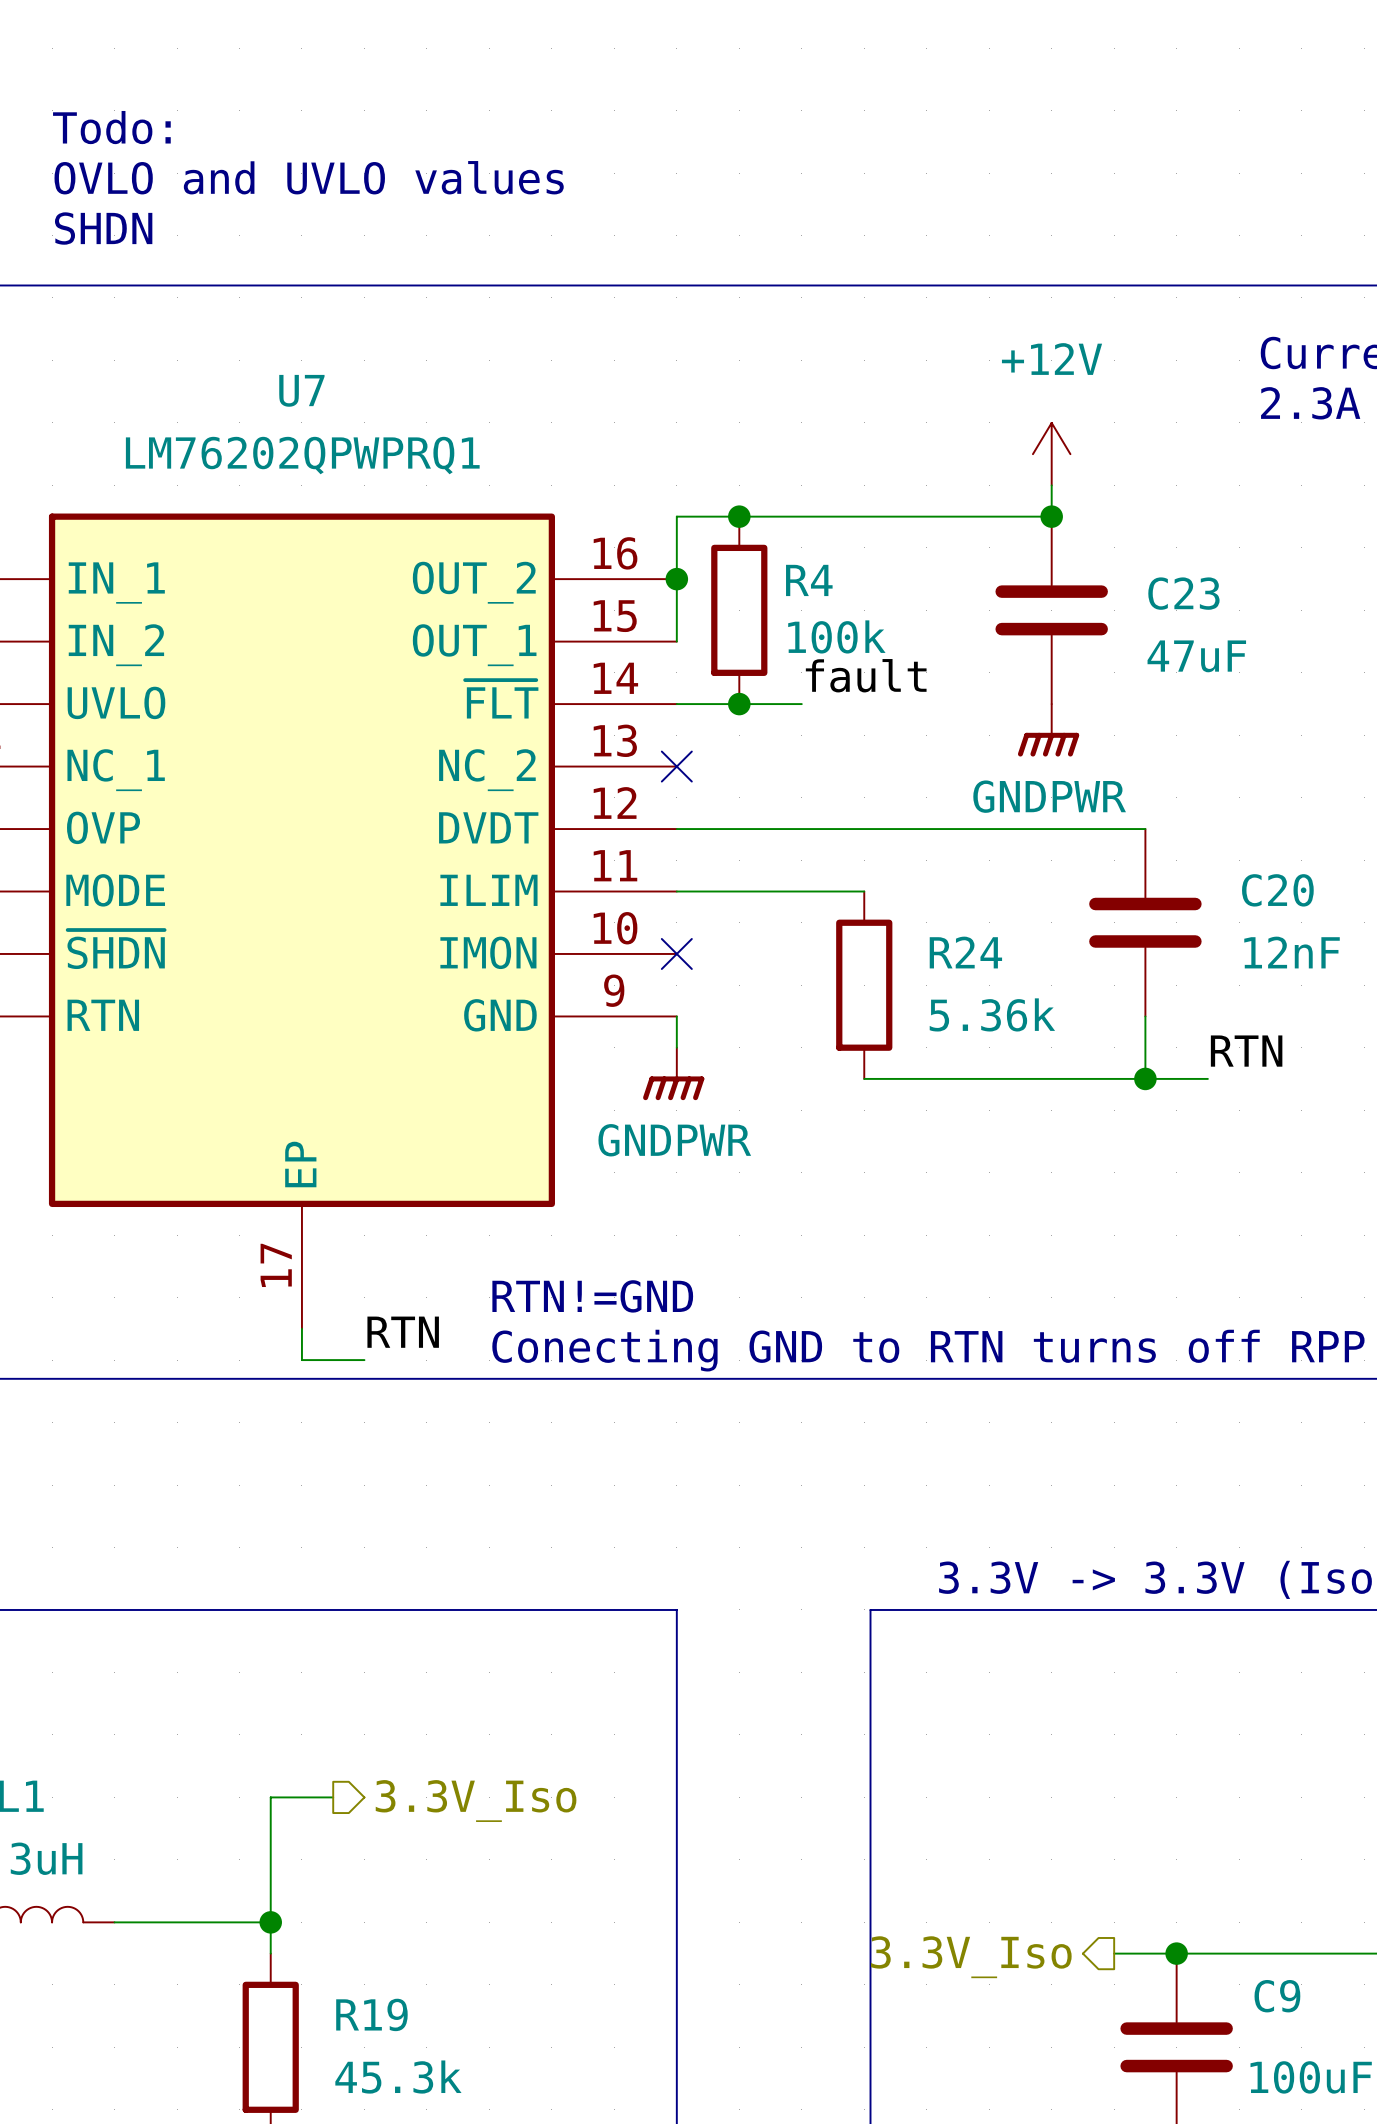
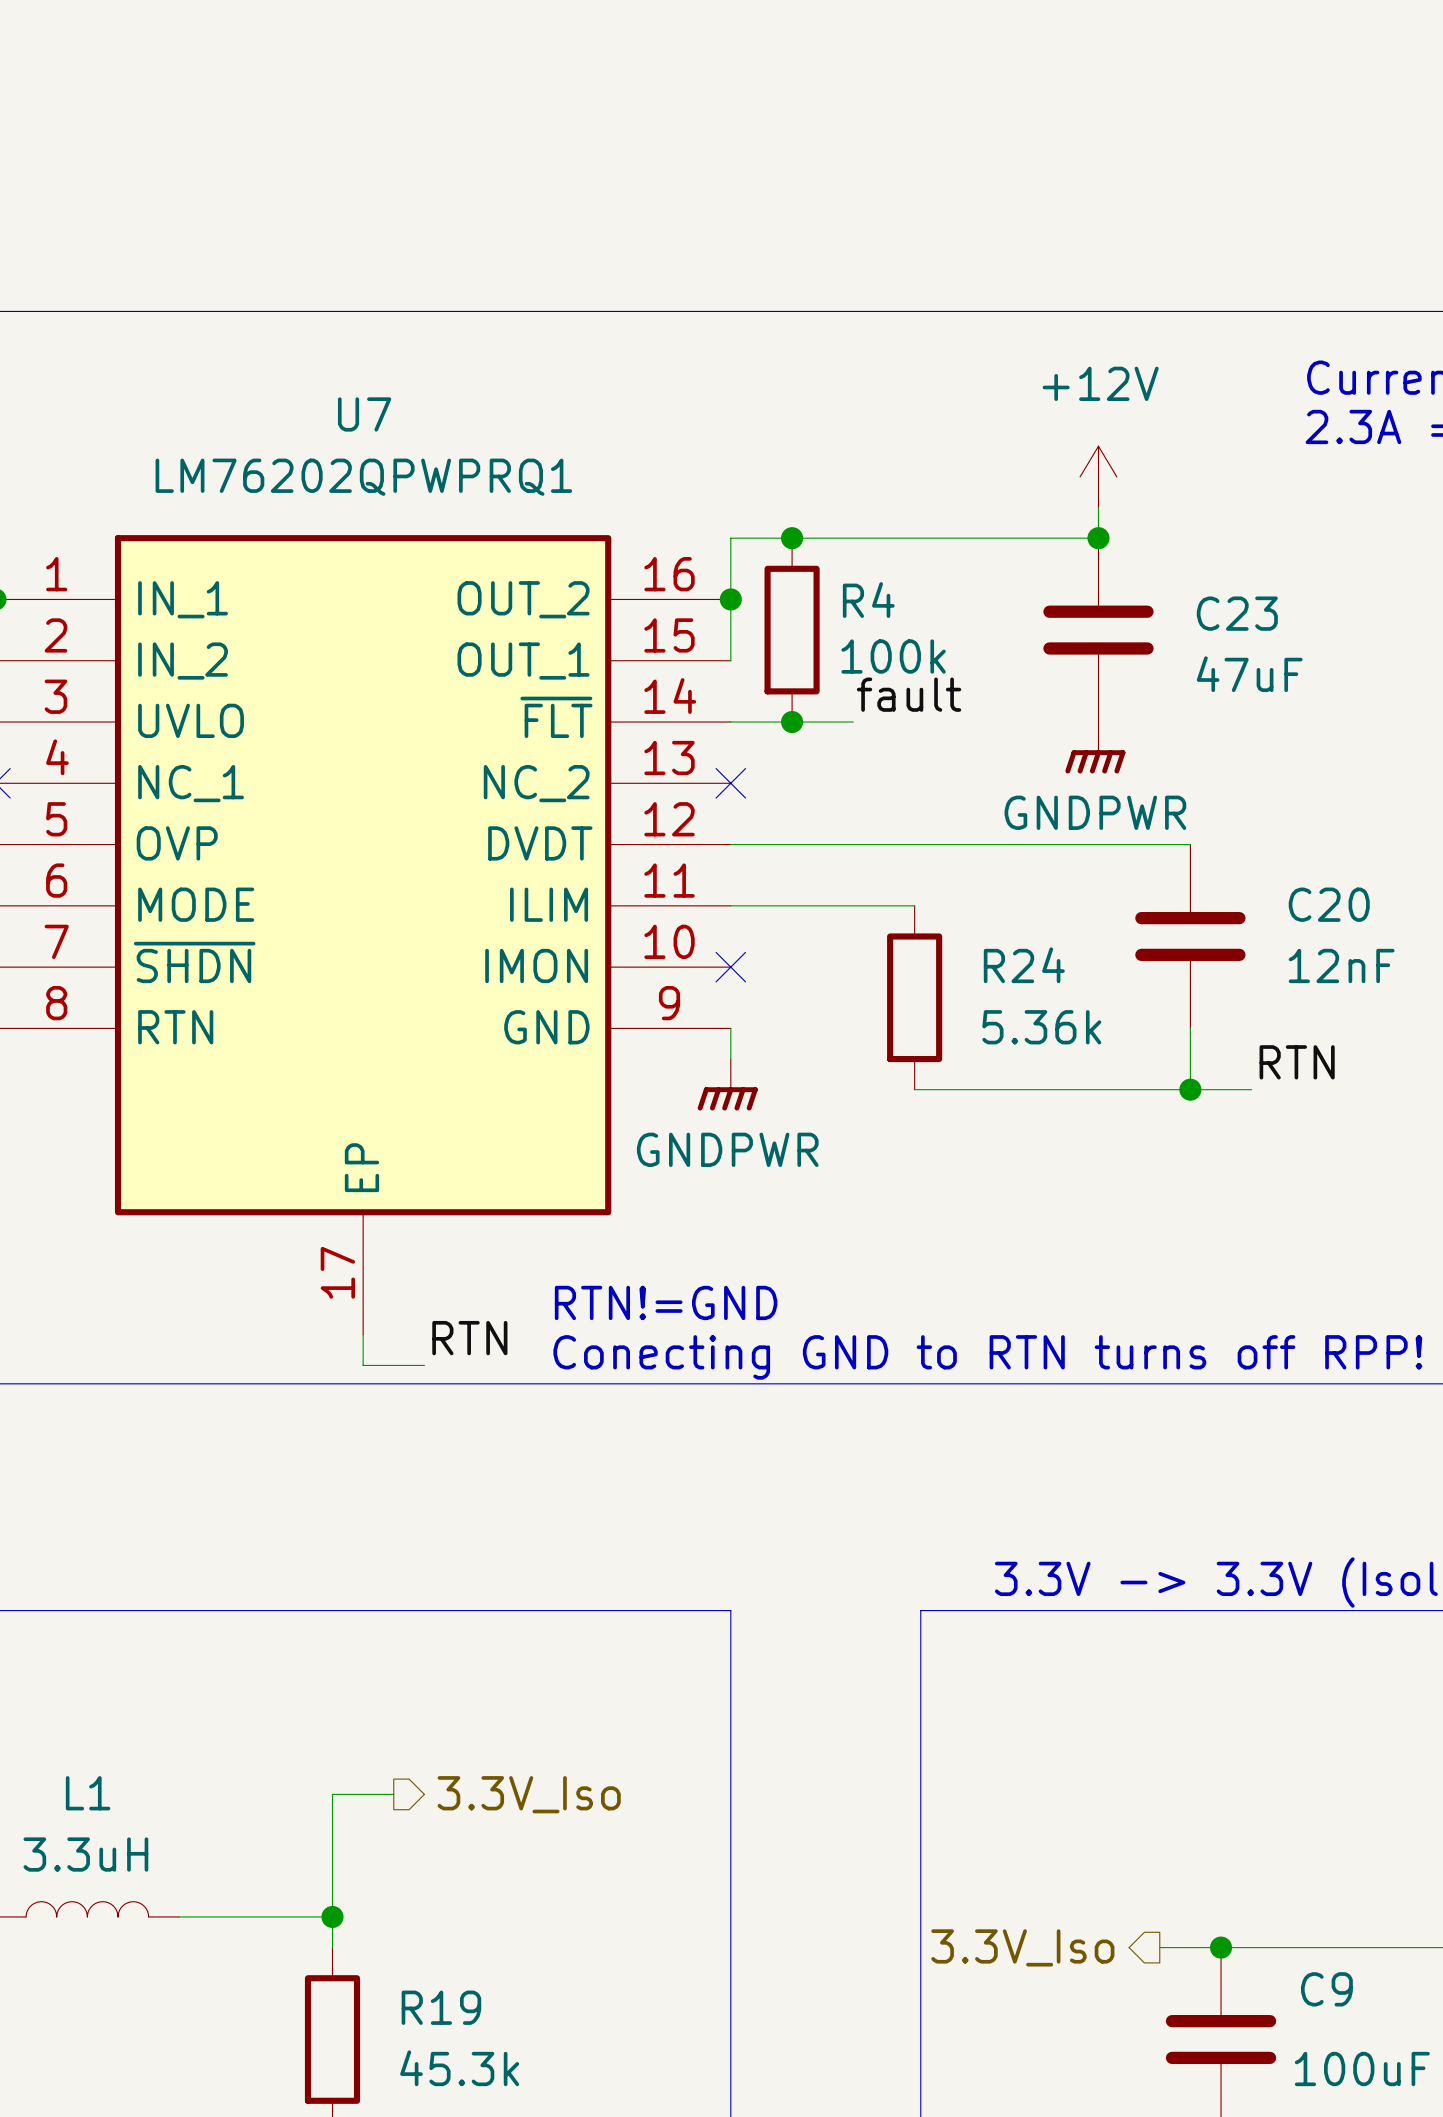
text: Todo: (111, 127) -> none
text: OVLO and UVLO values (309, 177) -> none
text: SHDN (103, 228) -> none

